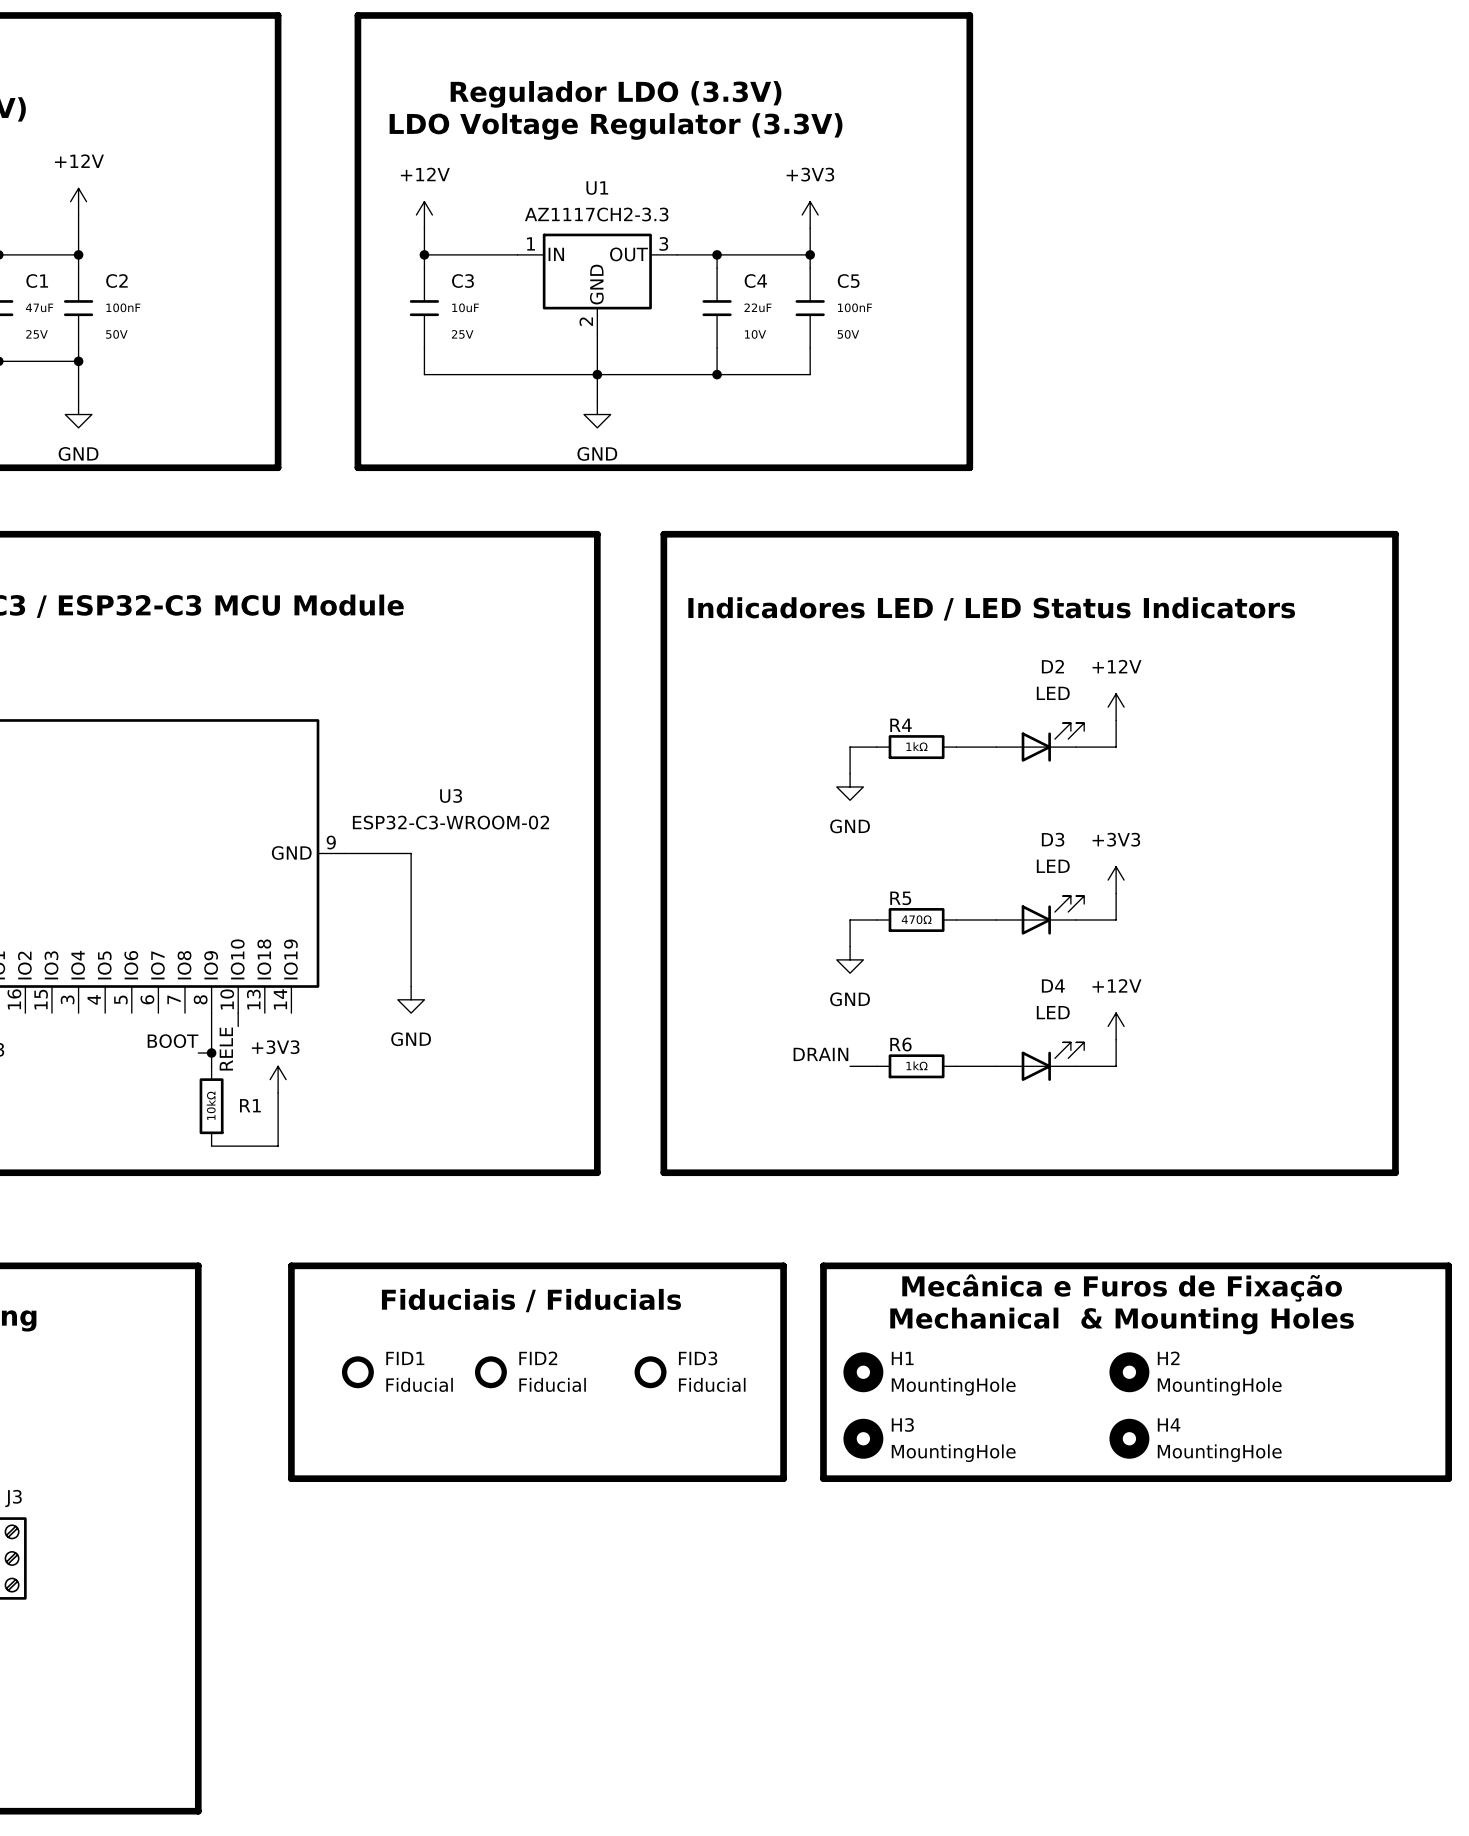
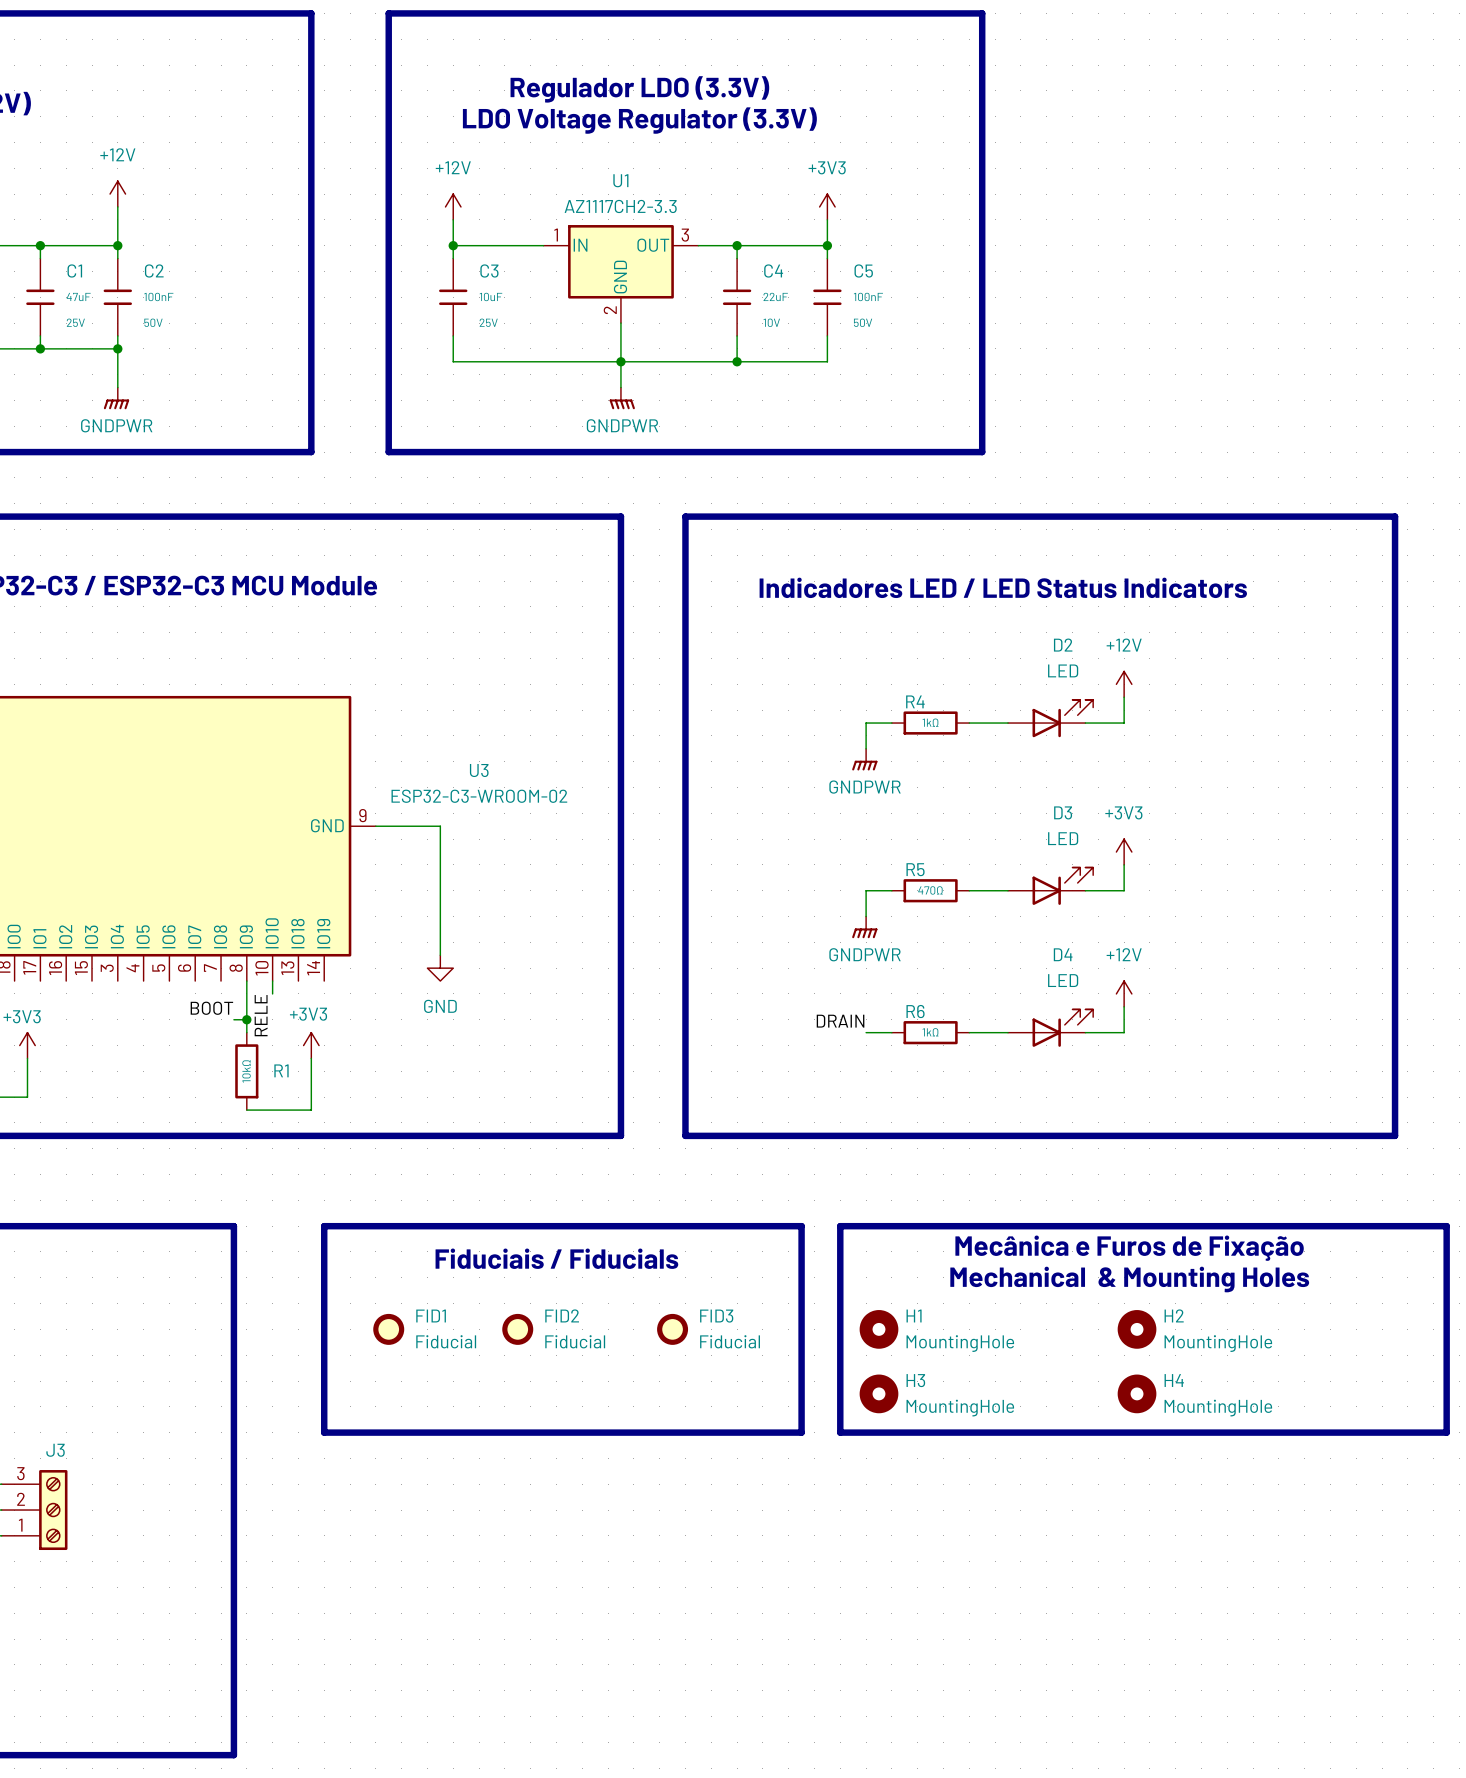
power symbol: GND (78, 414) -> GNDPWR (116, 398)
power symbol: GND (597, 414) -> GNDPWR (622, 398)
power symbol: GND (850, 786) -> GNDPWR (864, 759)
power symbol: GND (850, 959) -> GNDPWR (864, 927)

